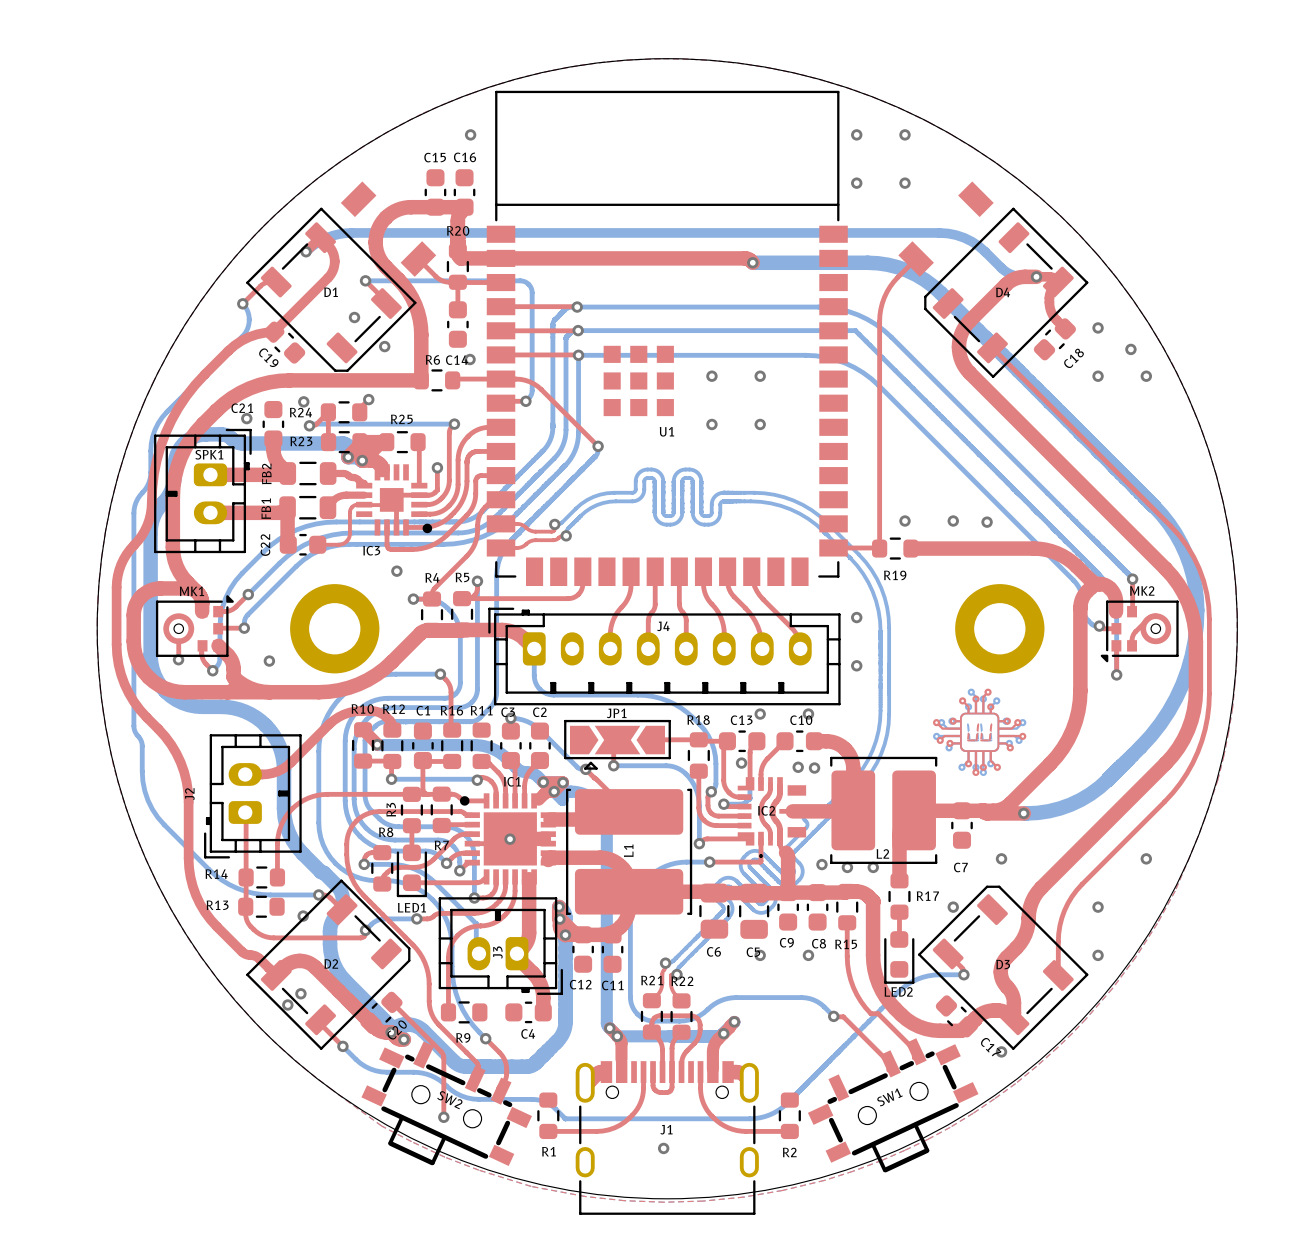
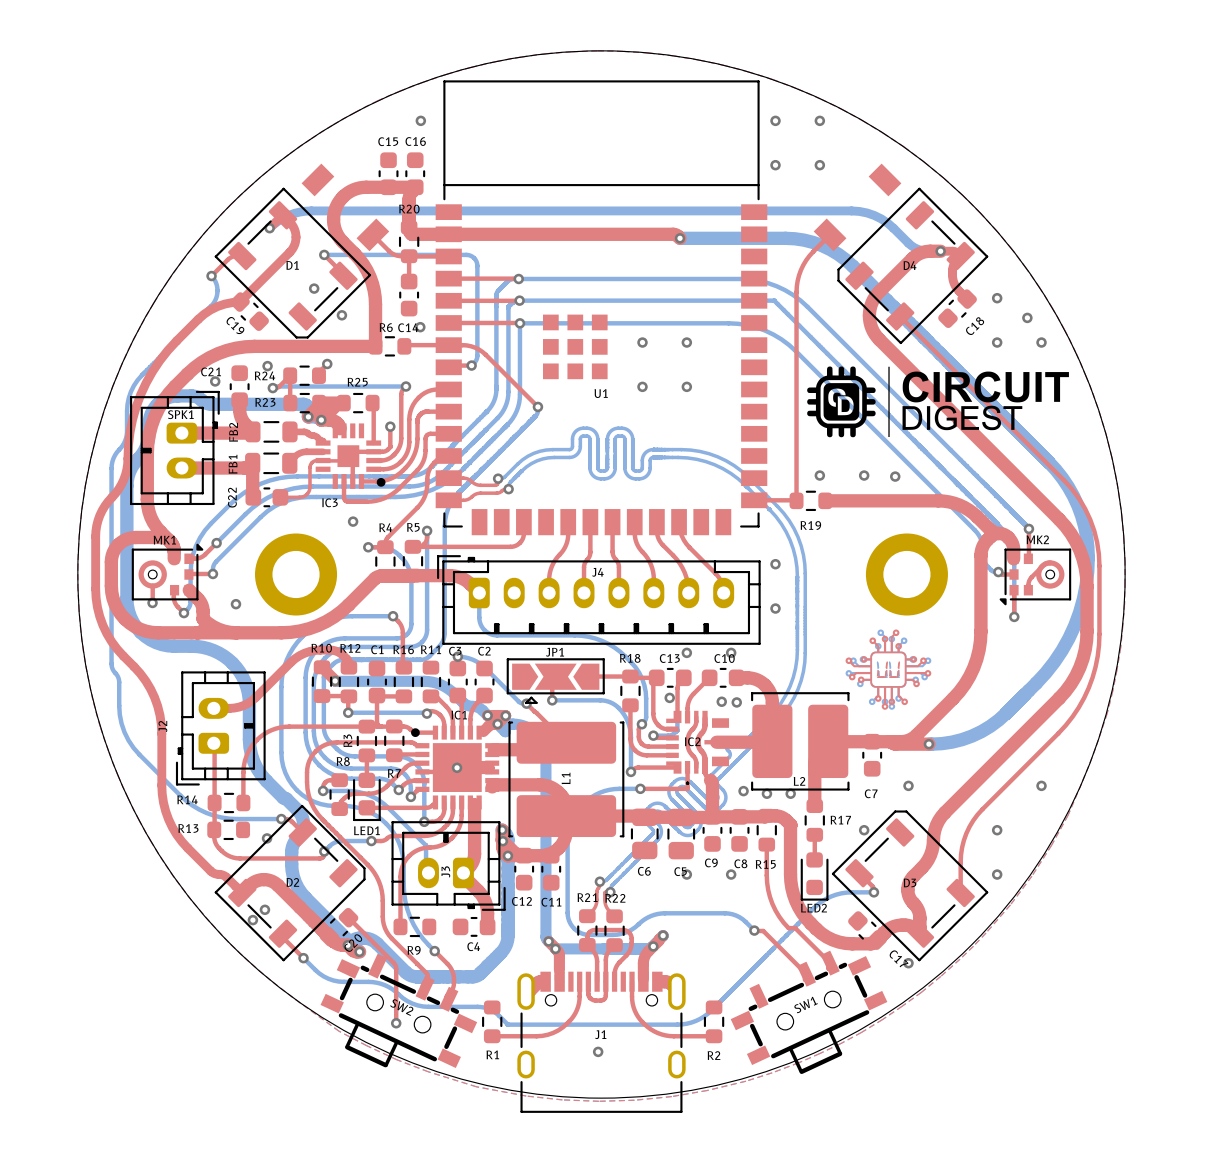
drawing: none -> [807, 366, 1069, 438]

